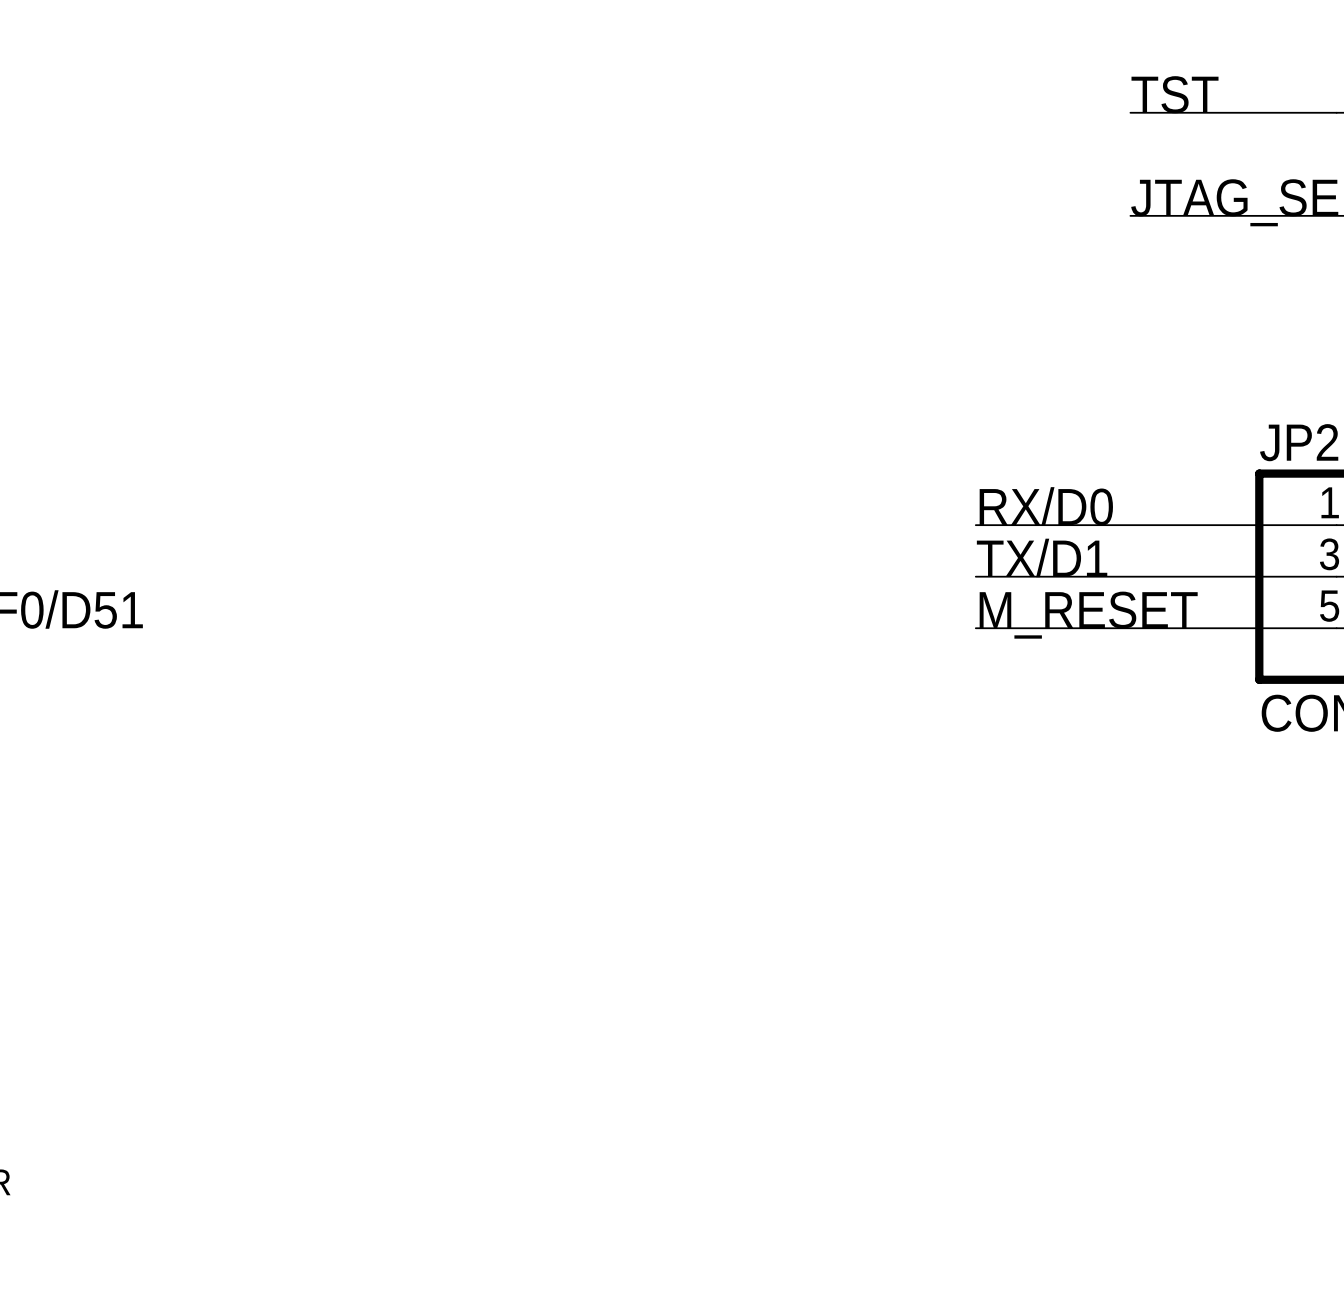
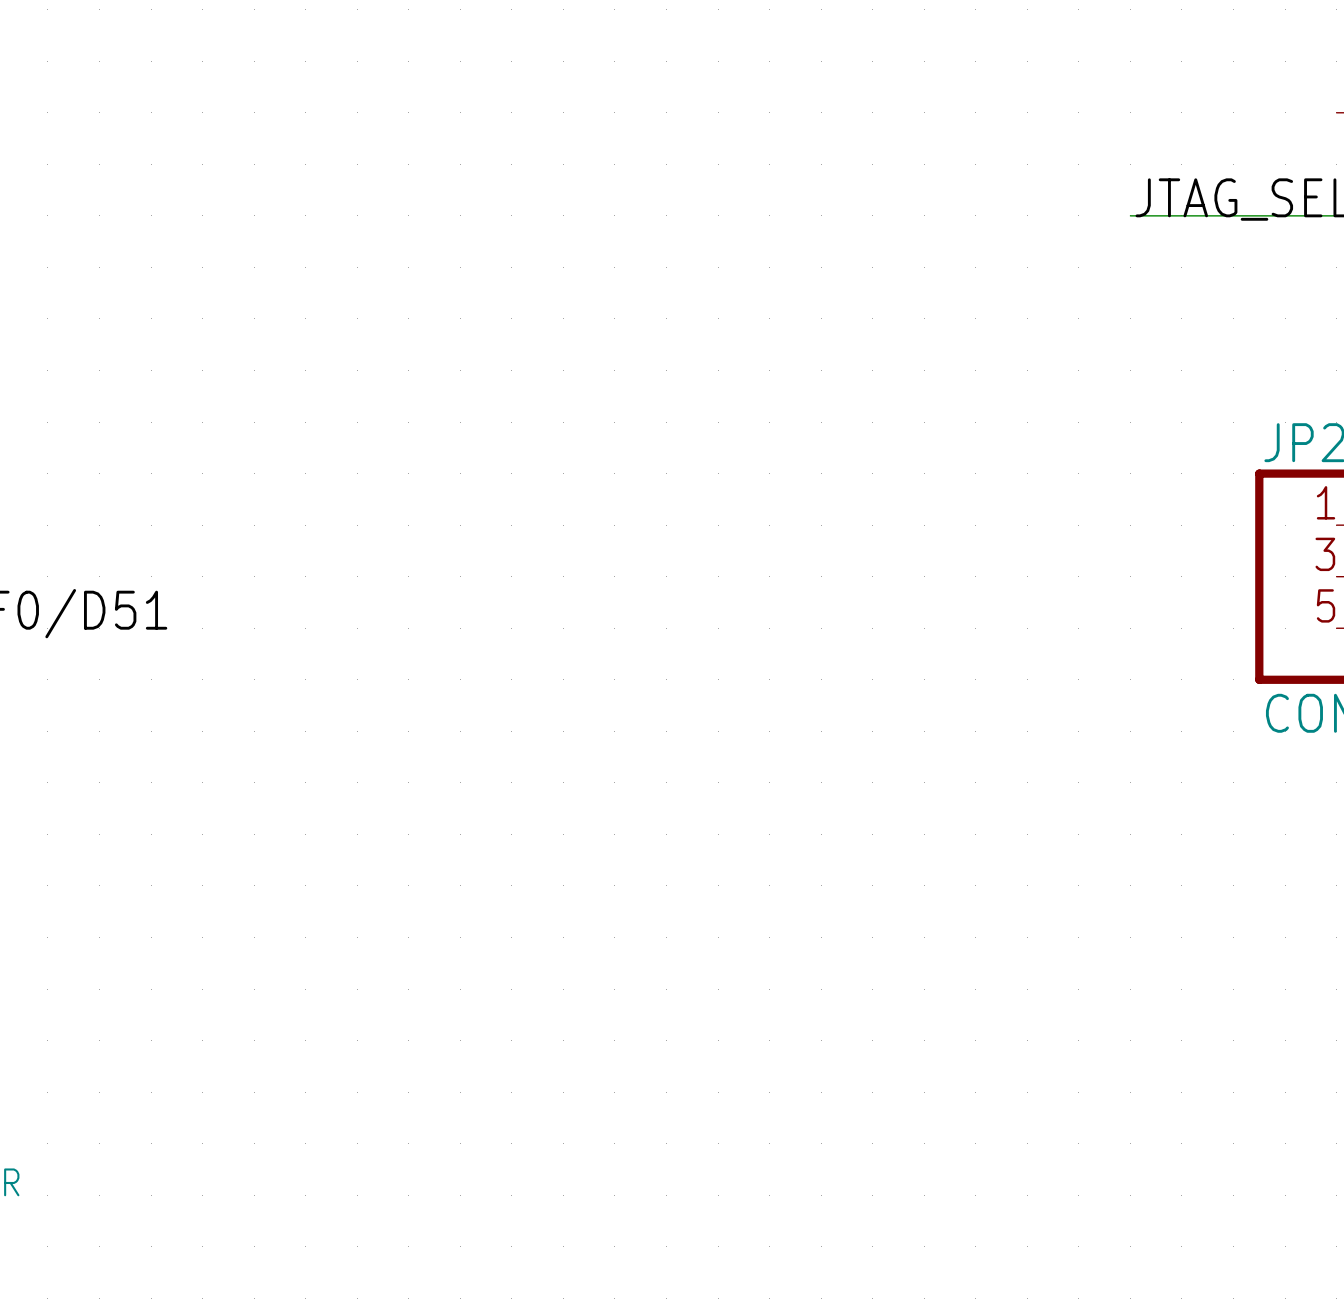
label: TST (1175, 94) -> none
wire: (1130, 112) (1336, 112) -> none
label: RX/D0 (1046, 506) -> none
wire: (975, 525) (1336, 525) -> none
label: TX/D1 (1042, 557) -> none
wire: (975, 576) (1336, 576) -> none
label: M_RESET (1088, 615) -> none
wire: (975, 628) (1336, 628) -> none

